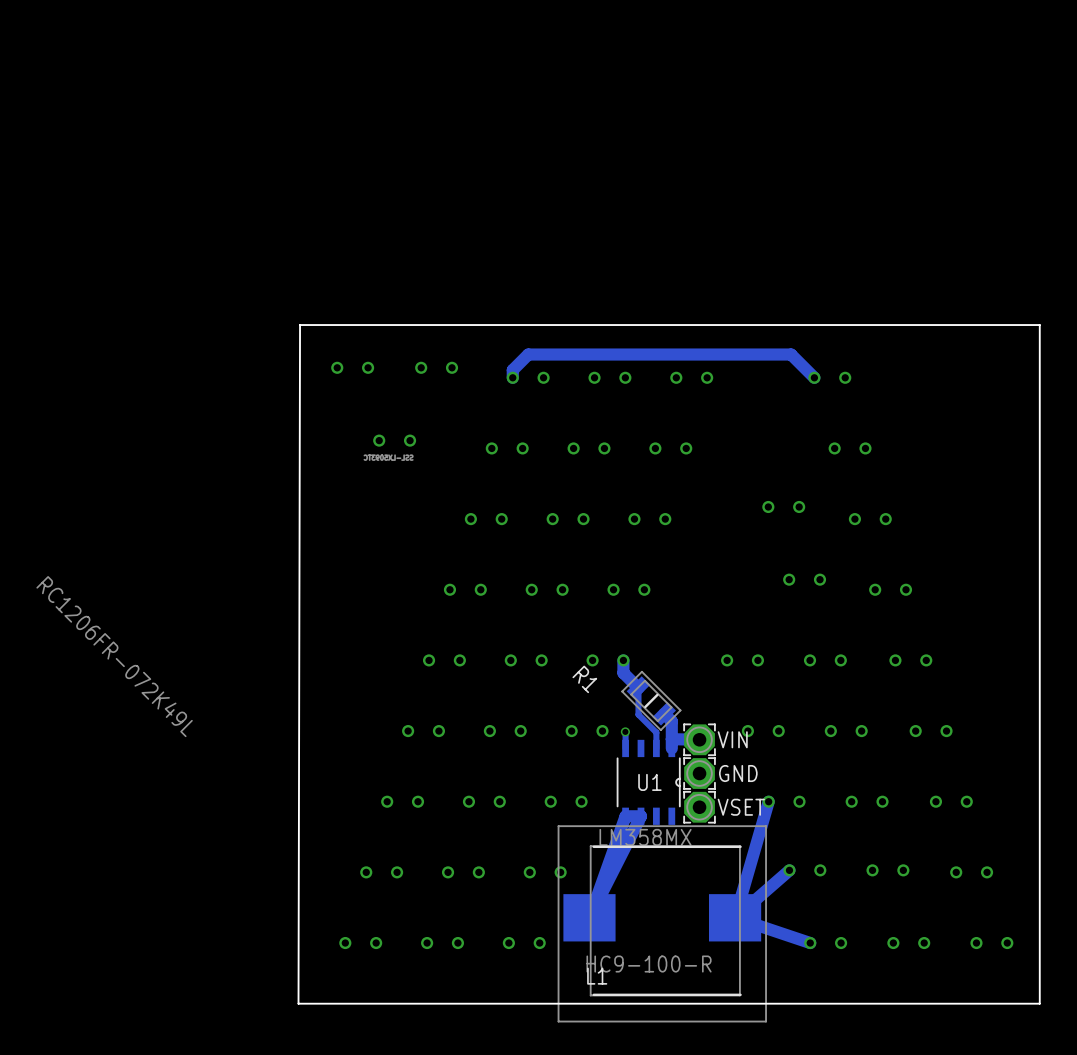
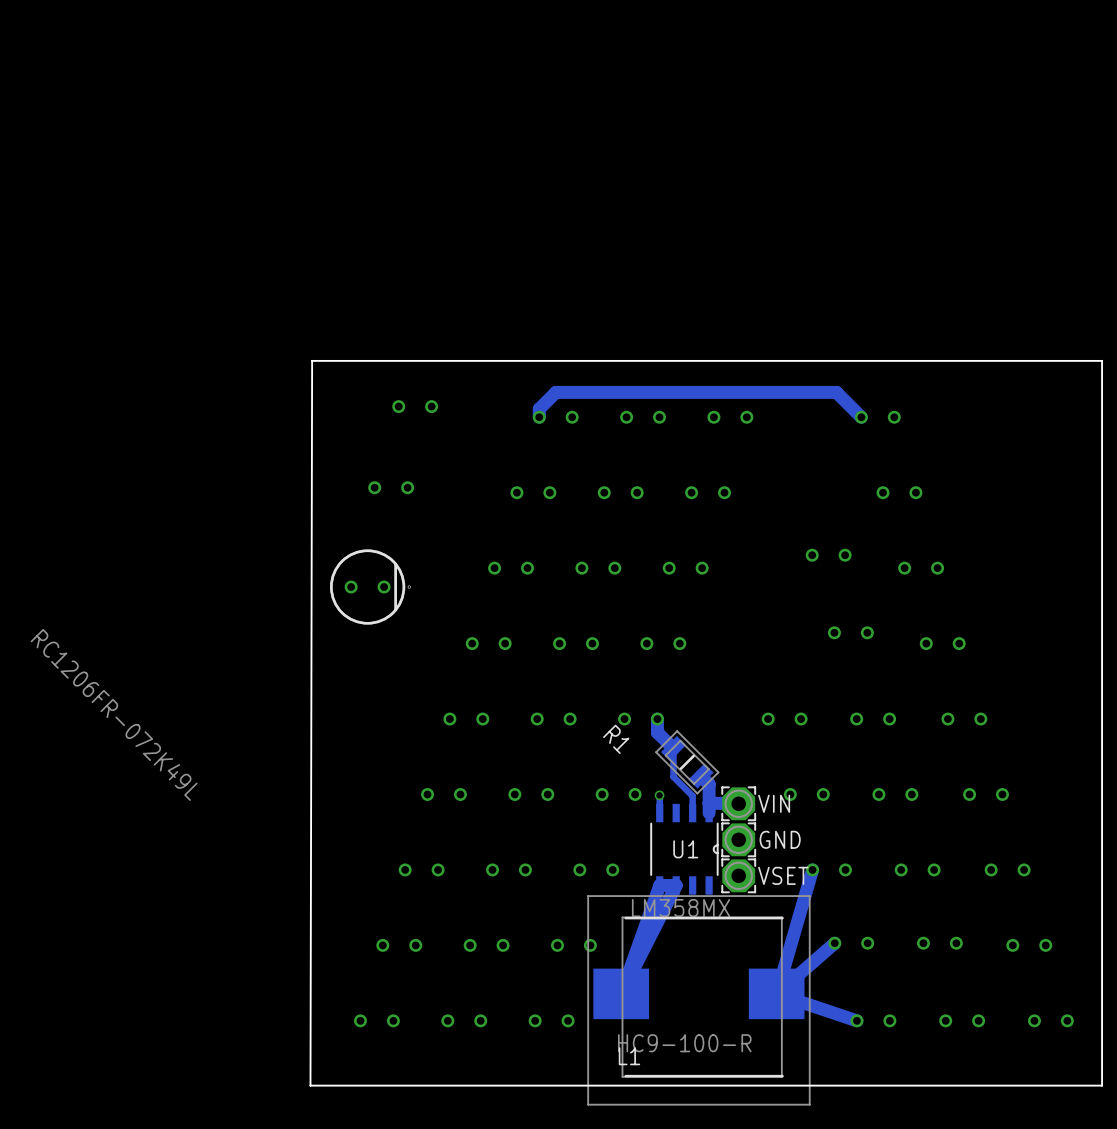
part: (352, 367) -> none
part: none -> (415, 406)
part: (436, 367) -> none
part side: top (394, 440) -> bottom (370, 587)
part: none -> (391, 487)

